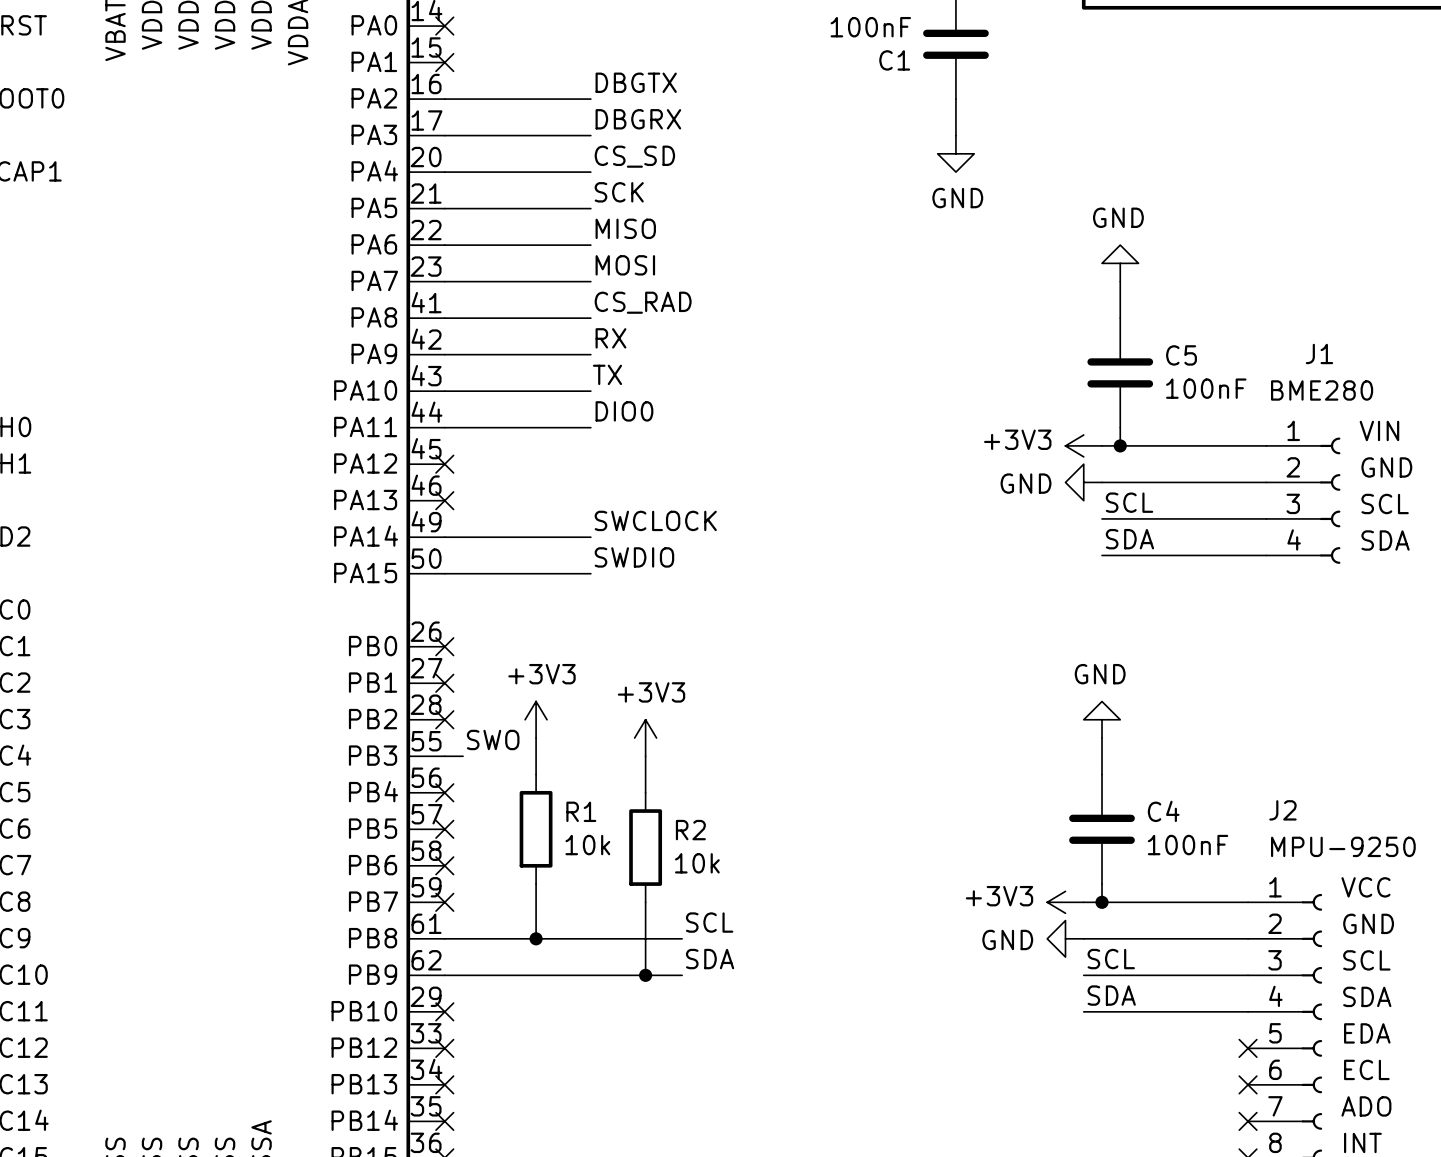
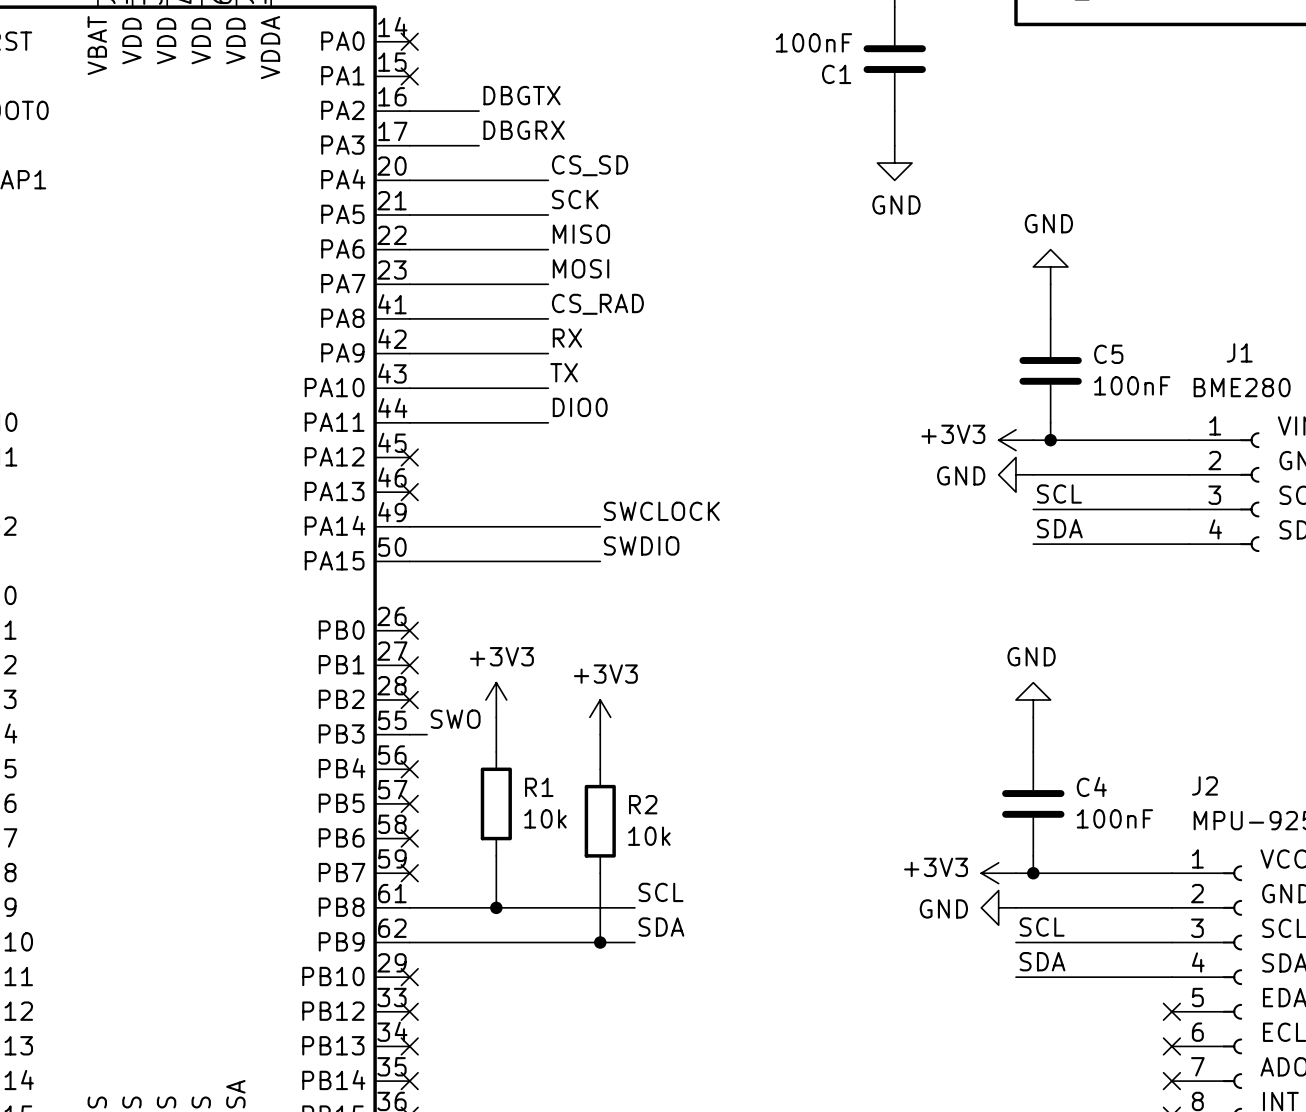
label position: DBGTX (636, 82) -> DBGTX (522, 95)
wire: (517, 99) (590, 99) -> none
label position: DBGRX (638, 119) -> DBGRX (524, 130)
wire: (517, 135) (590, 135) -> none
label position: SWCLOCK (655, 520) -> SWCLOCK (661, 511)
wire: none -> (548, 526) (600, 526)
label position: SWDIO (634, 557) -> SWDIO (641, 545)
wire: none -> (548, 561) (600, 561)

